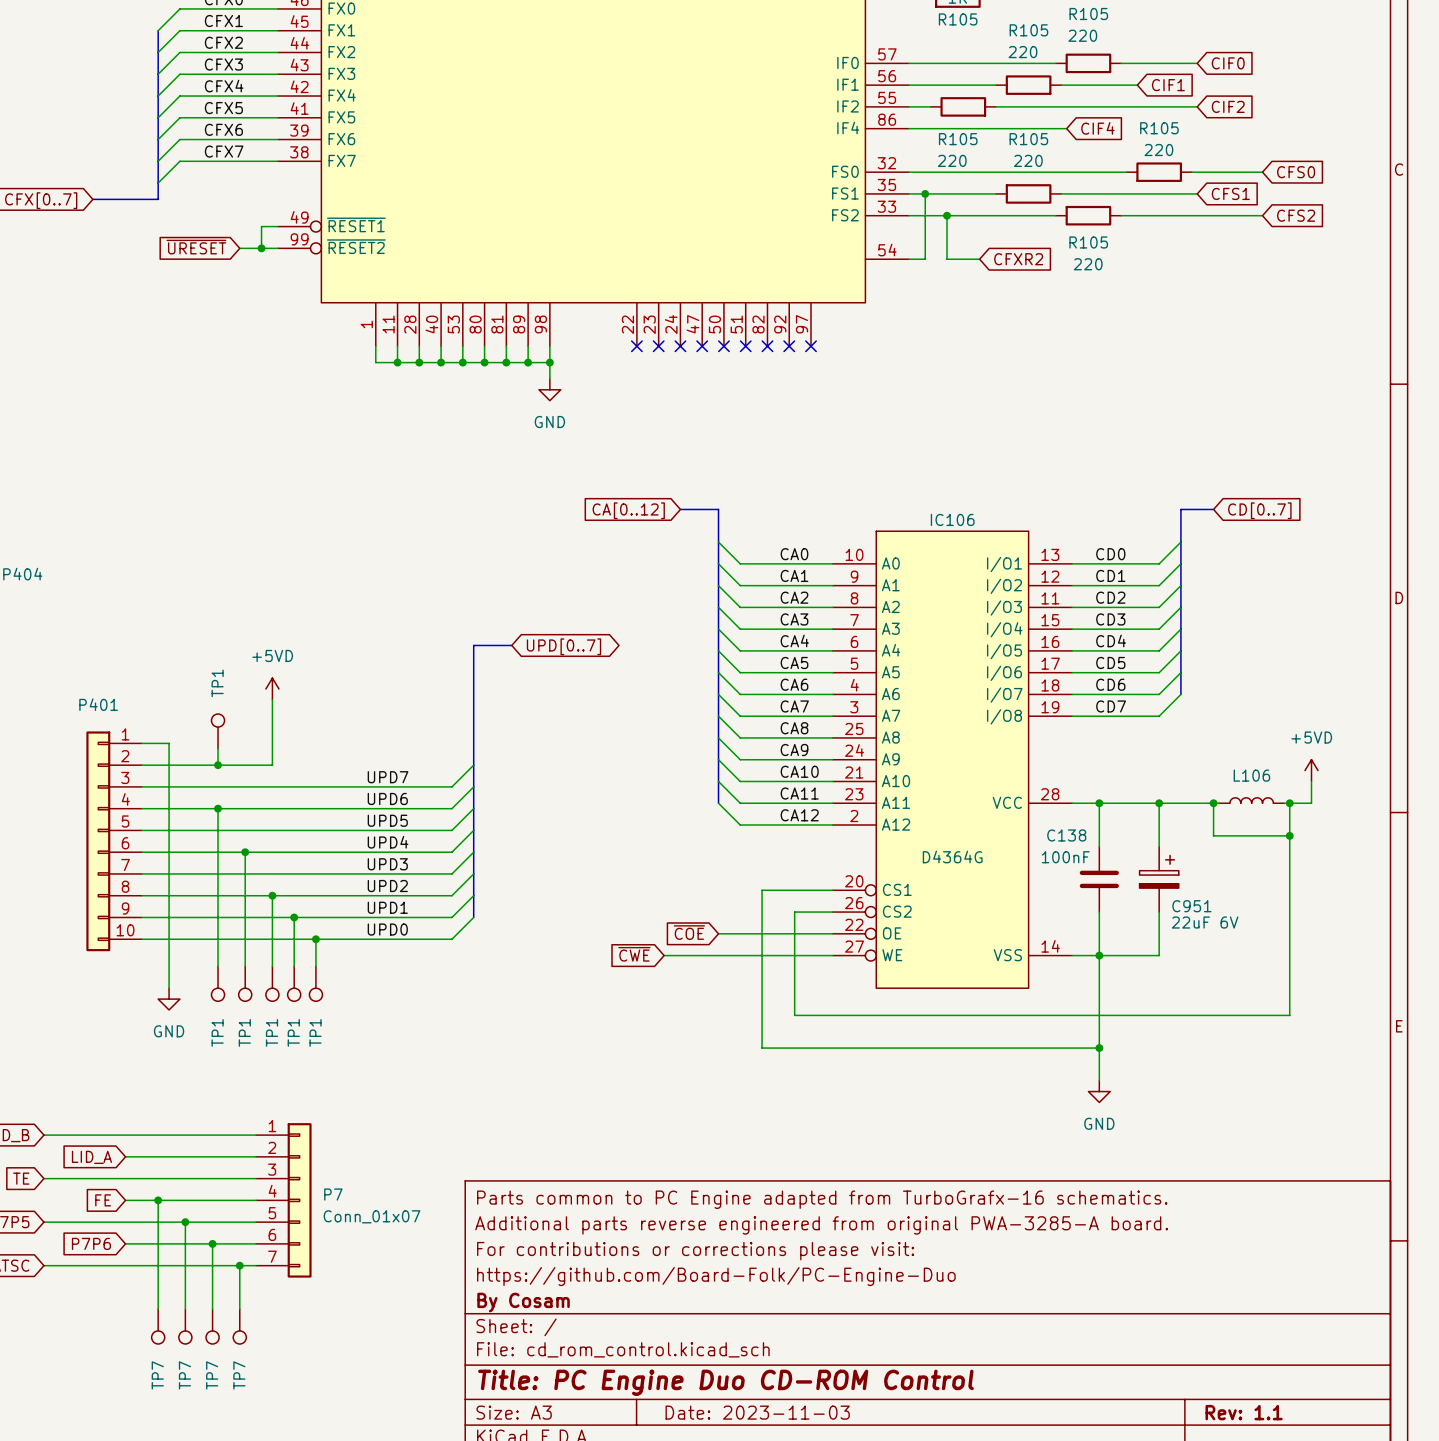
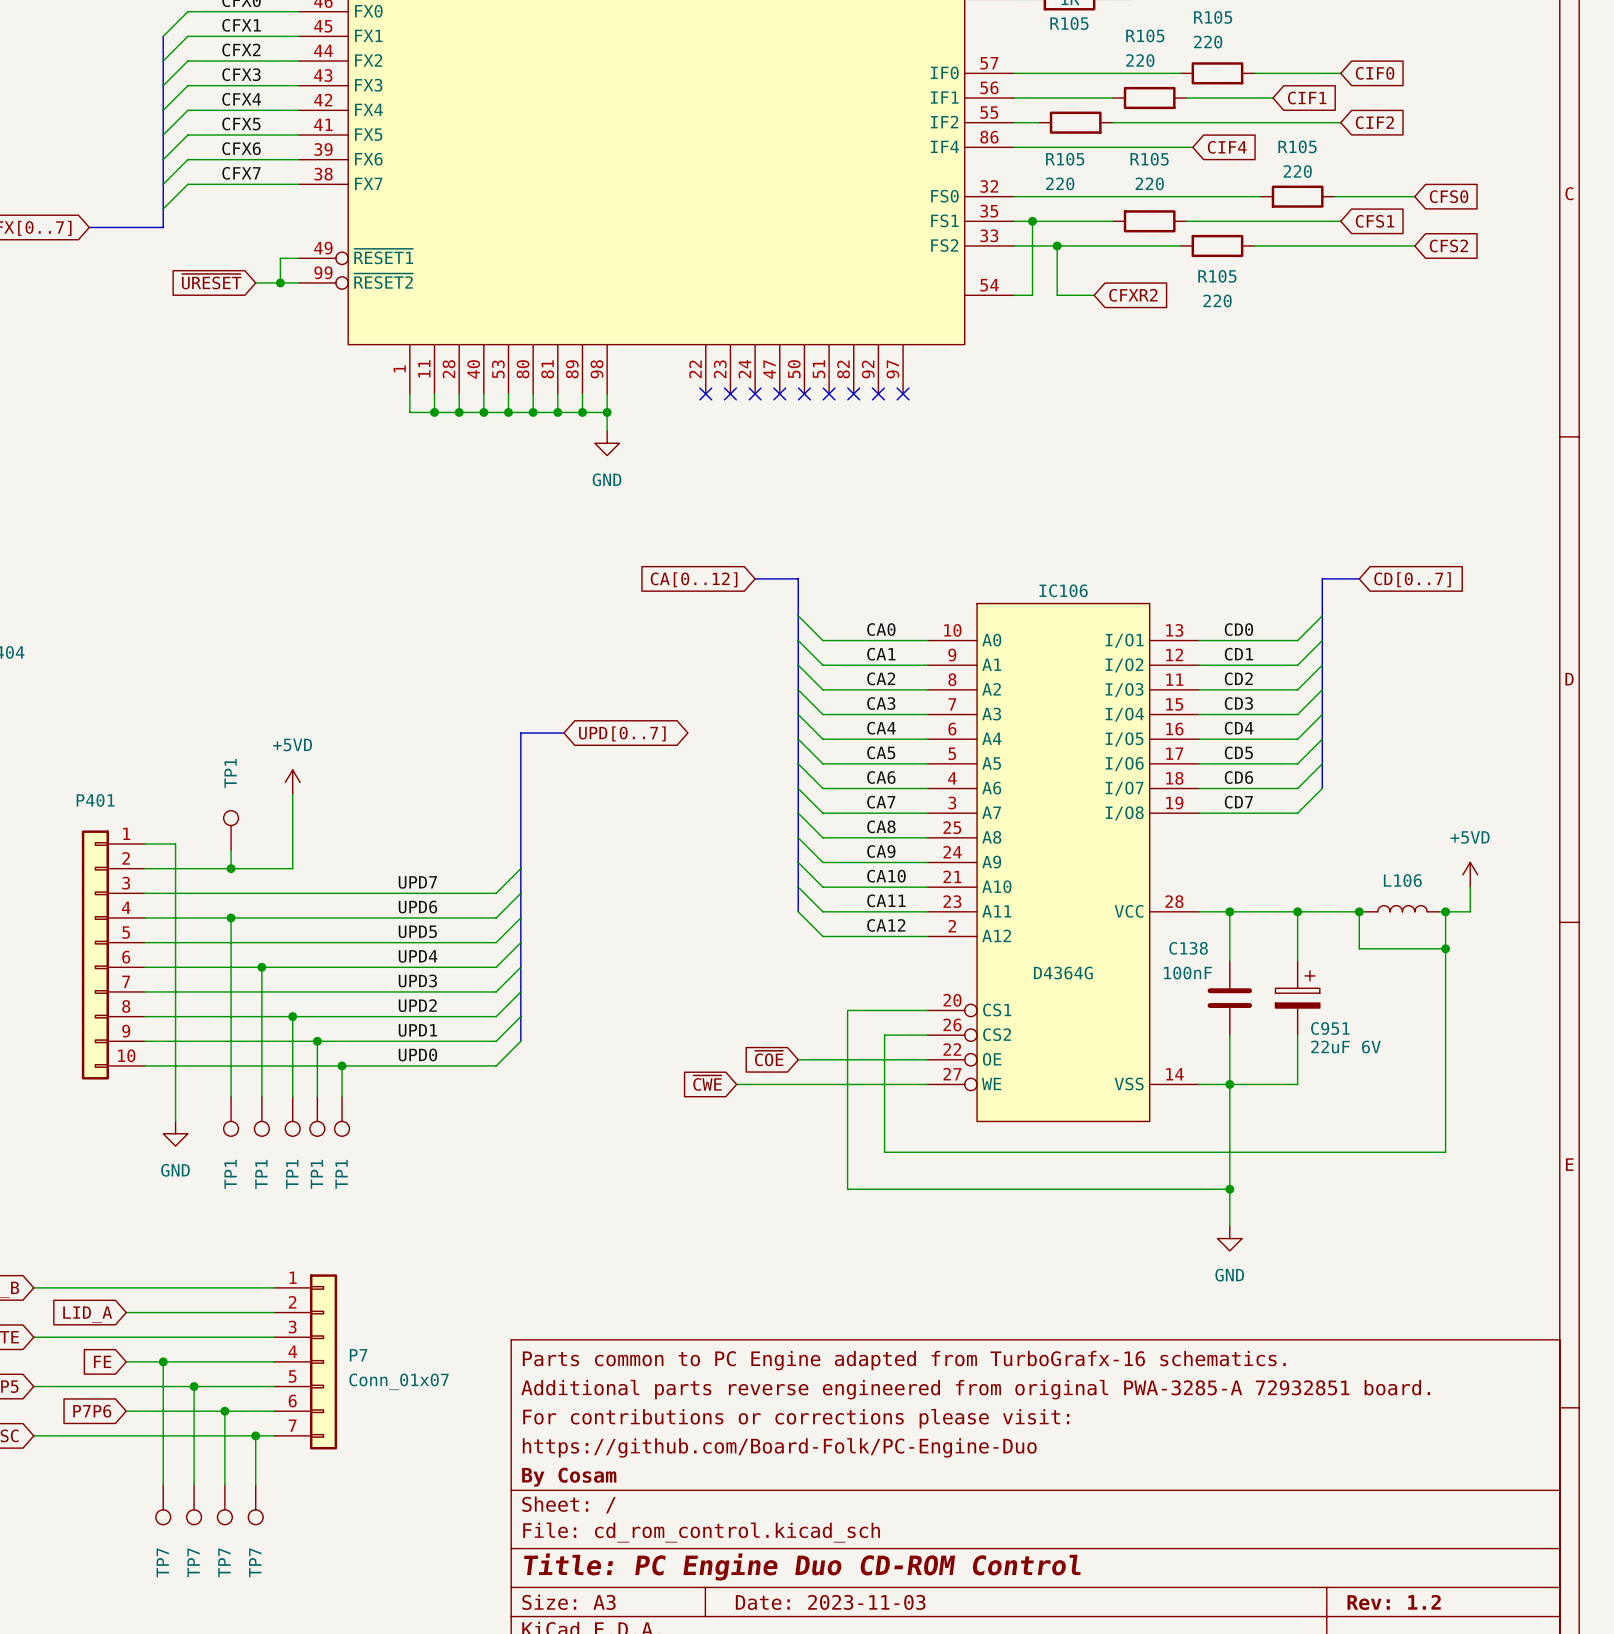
title block: Additional parts reverse engineered from original PWA-3285-A board. (821, 1225) -> Additional parts reverse engineered from original PWA-3285-A 72932851 board. (975, 1389)
title block: Rev: 1.1 (1244, 1412) -> Rev: 1.2 (1394, 1602)

